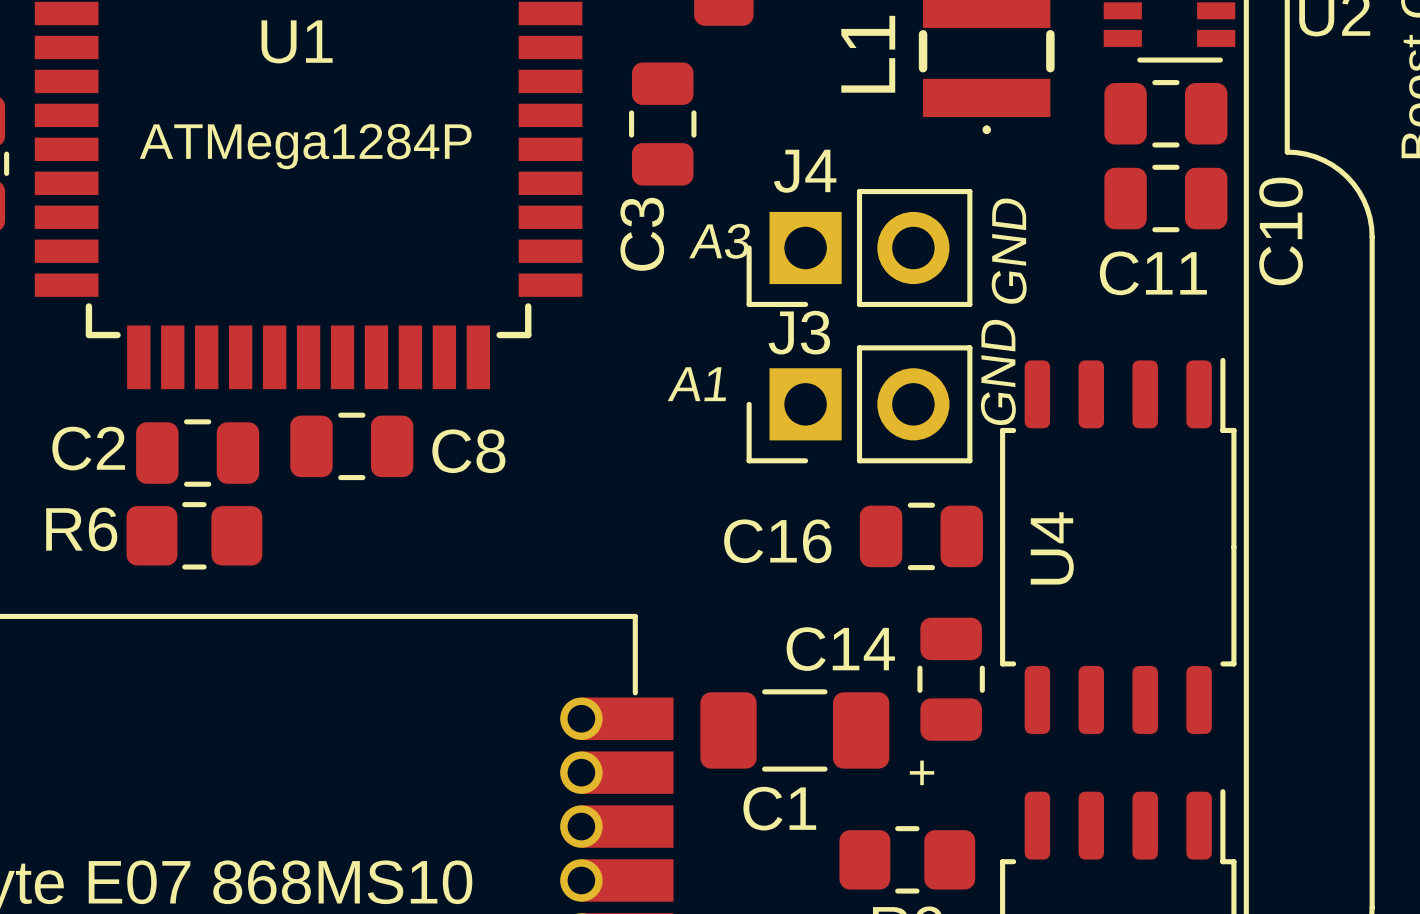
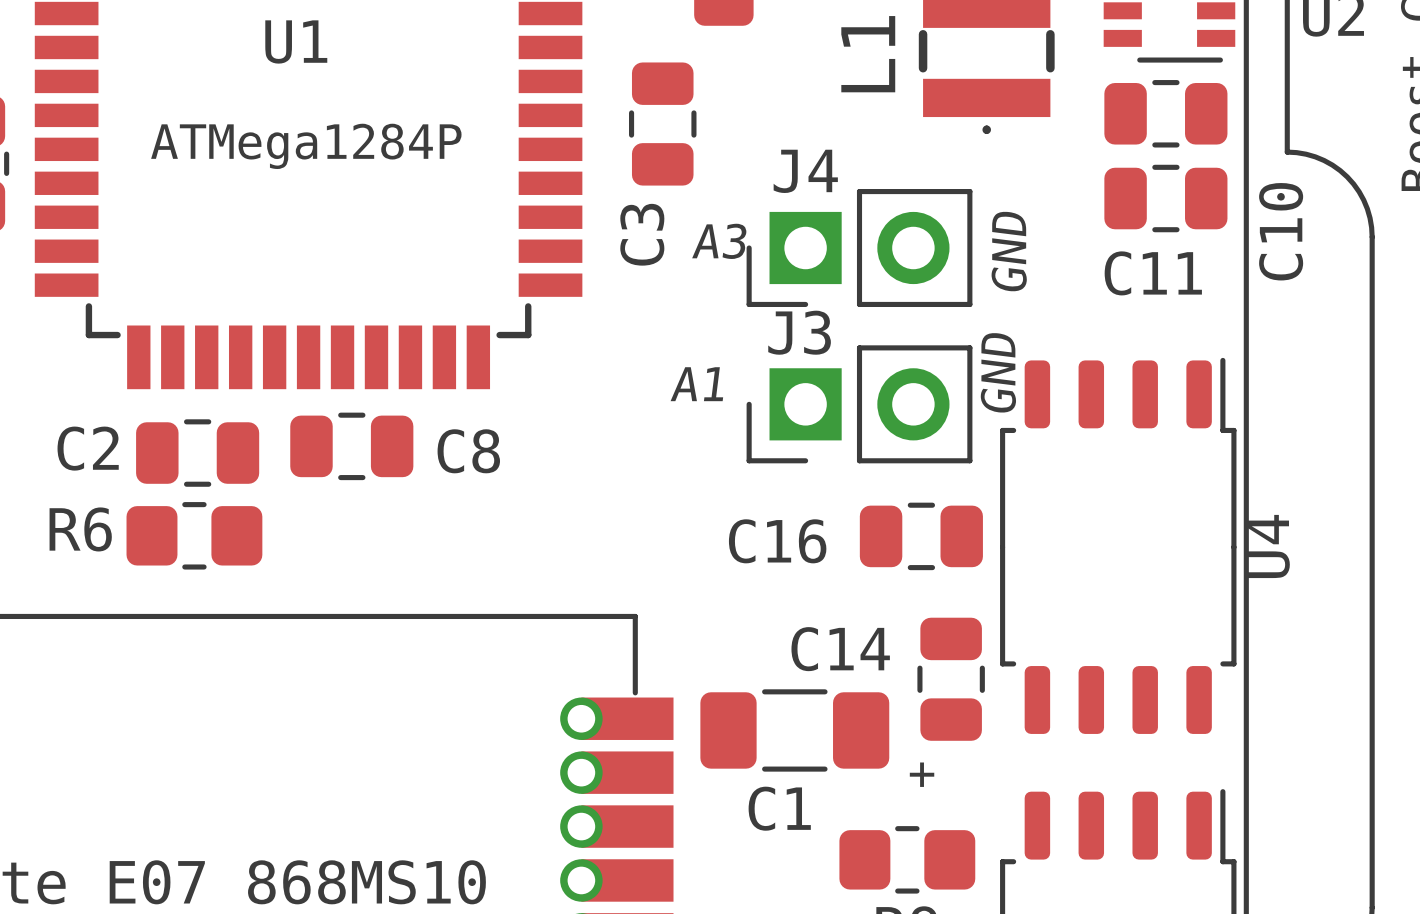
U4 name position: U4 (1052, 548) -> U4 (1268, 546)

